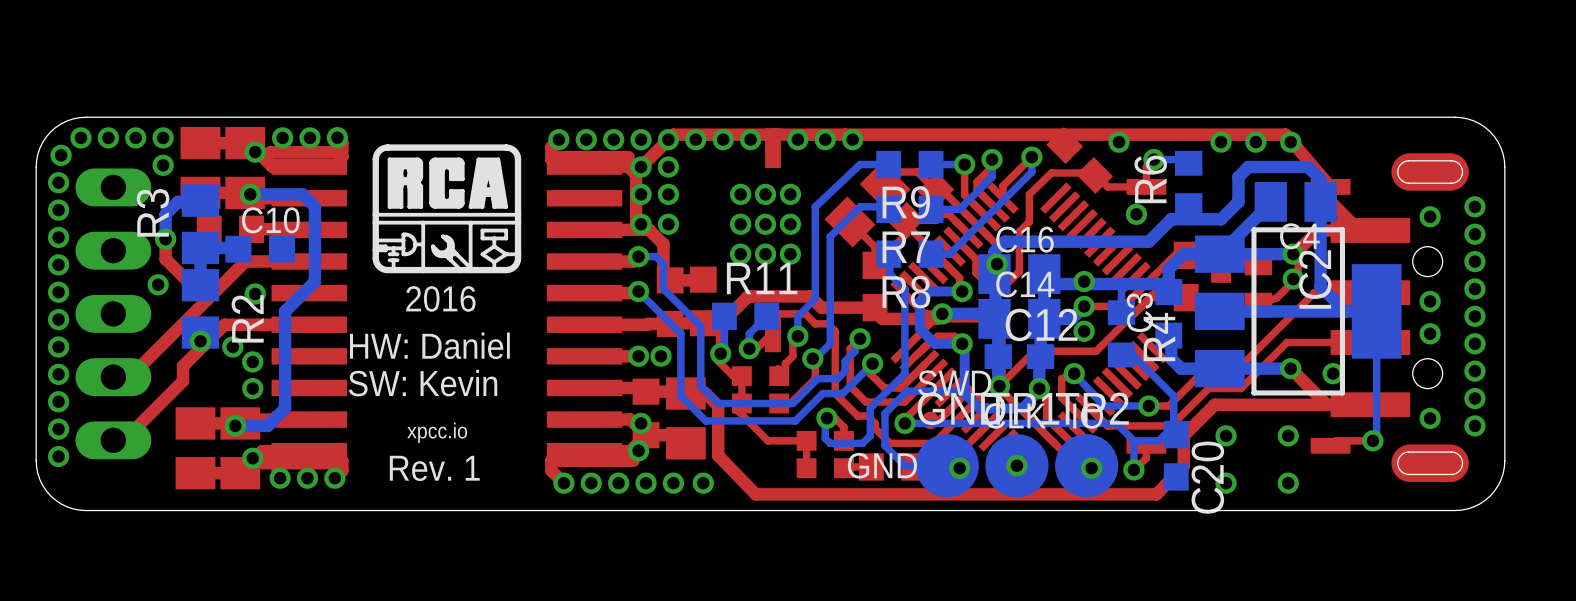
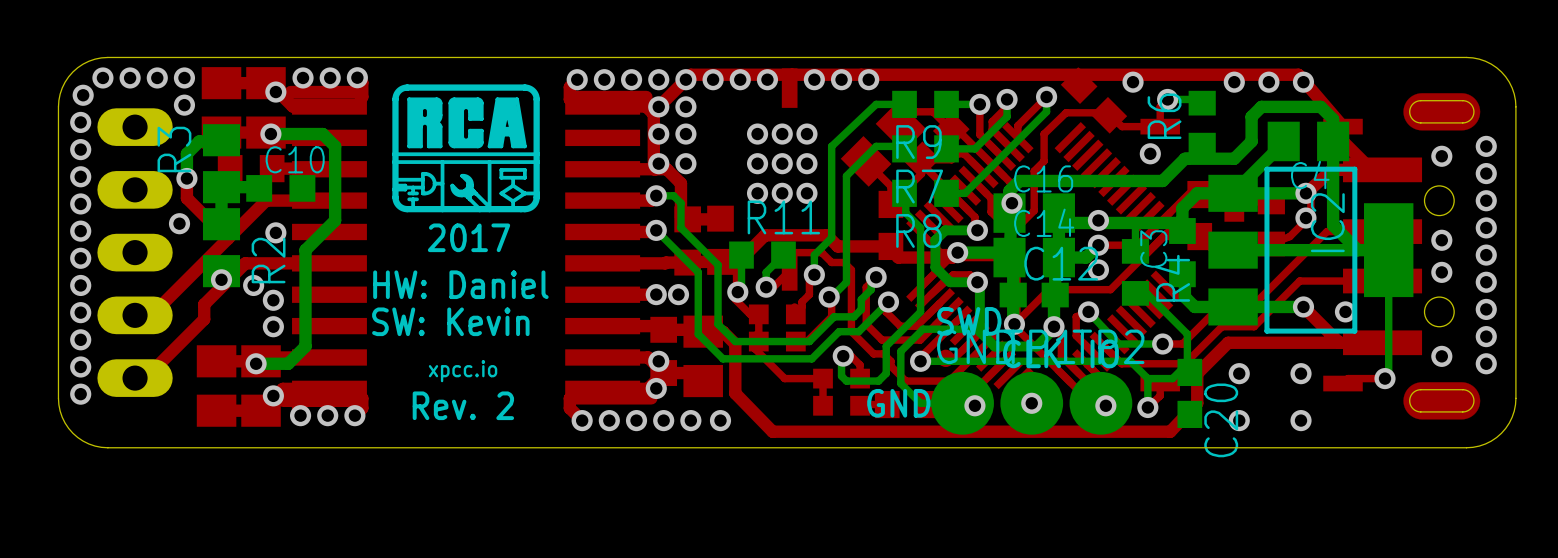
text: 2016 (440, 298) -> 2017 (469, 237)
text: Rev. 1 (434, 468) -> Rev. 2 (463, 405)

